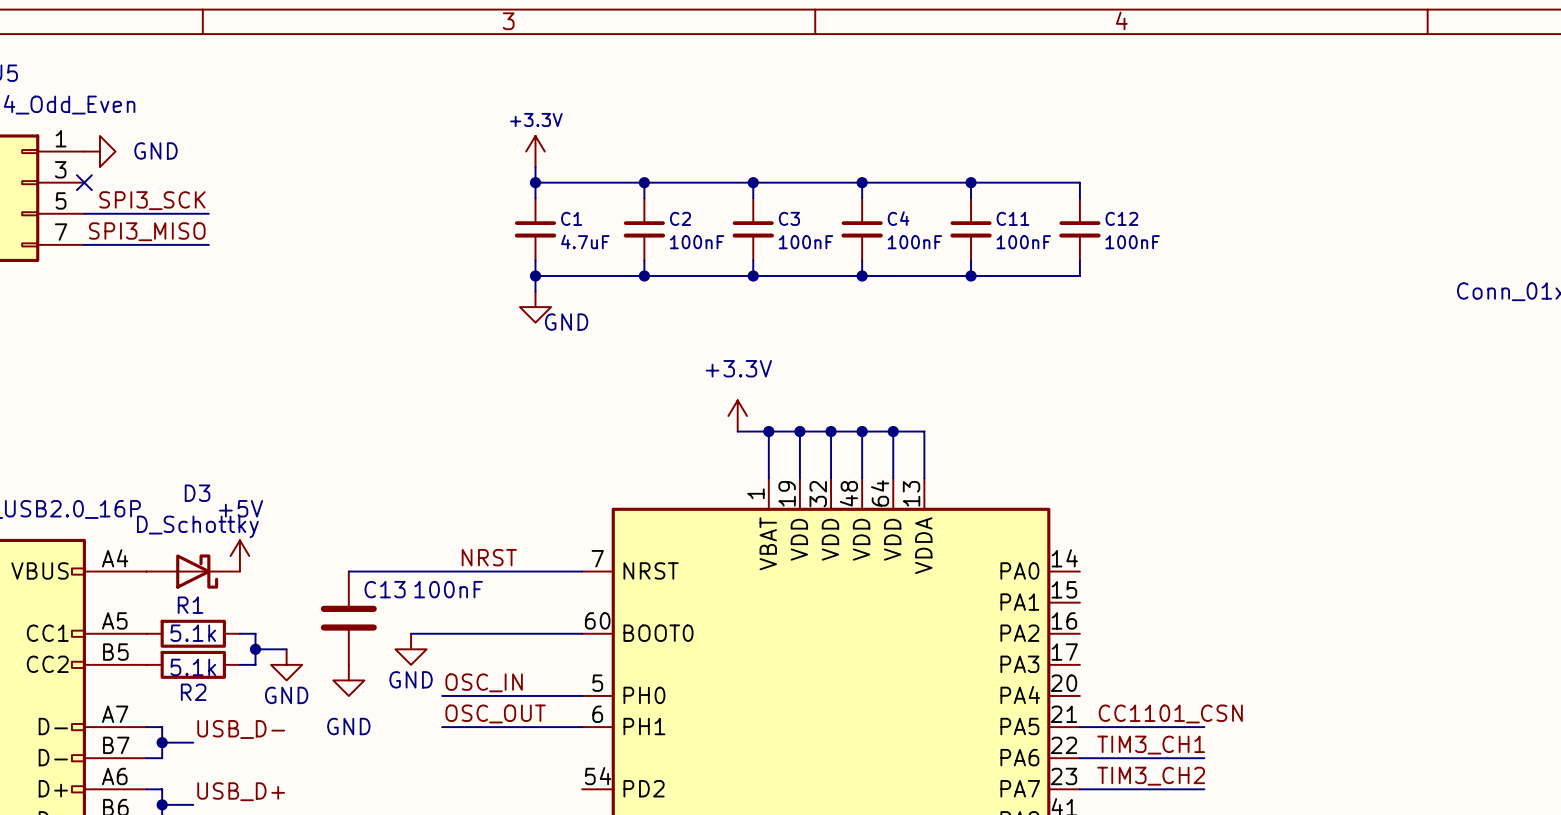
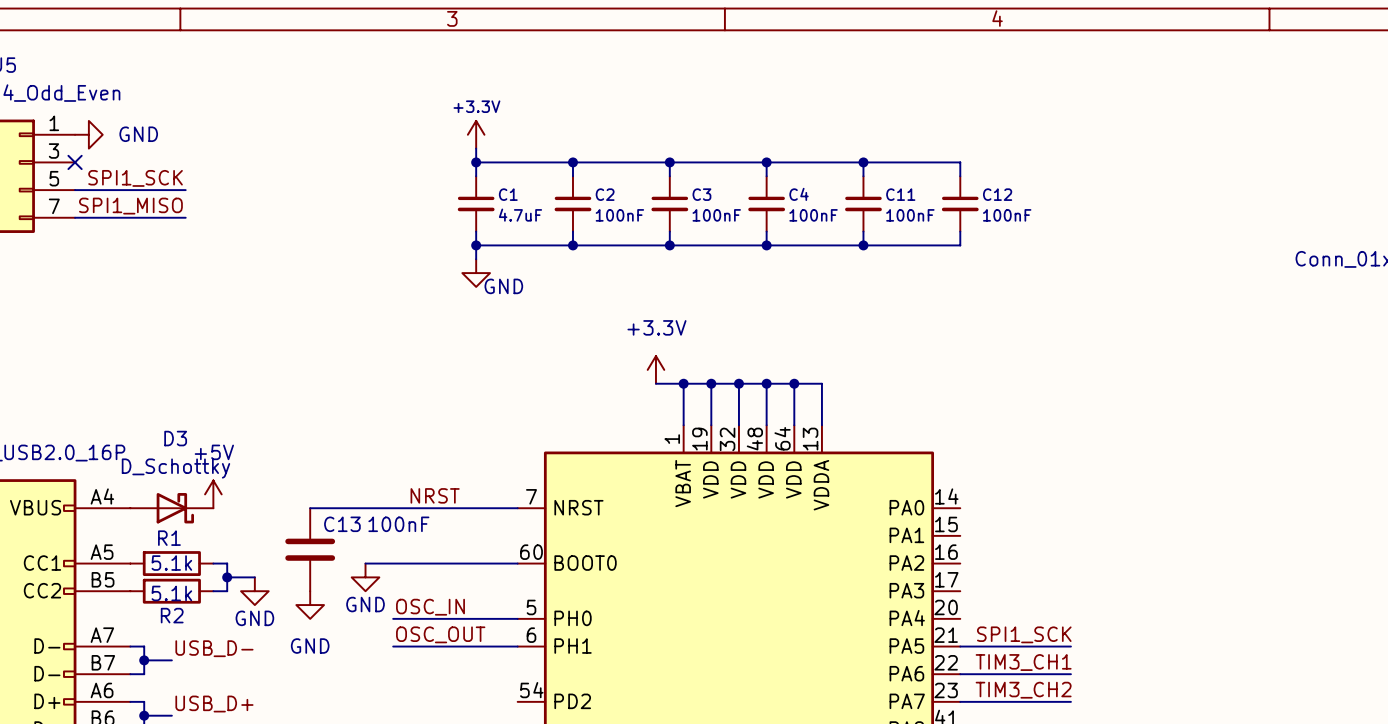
label: SPI3_SCK (152, 200) -> SPI1_SCK (135, 178)
label: SPI3_MISO (147, 231) -> SPI1_MISO (130, 206)
label: CC1101_CSN (1170, 713) -> SPI1_SCK (1024, 634)

